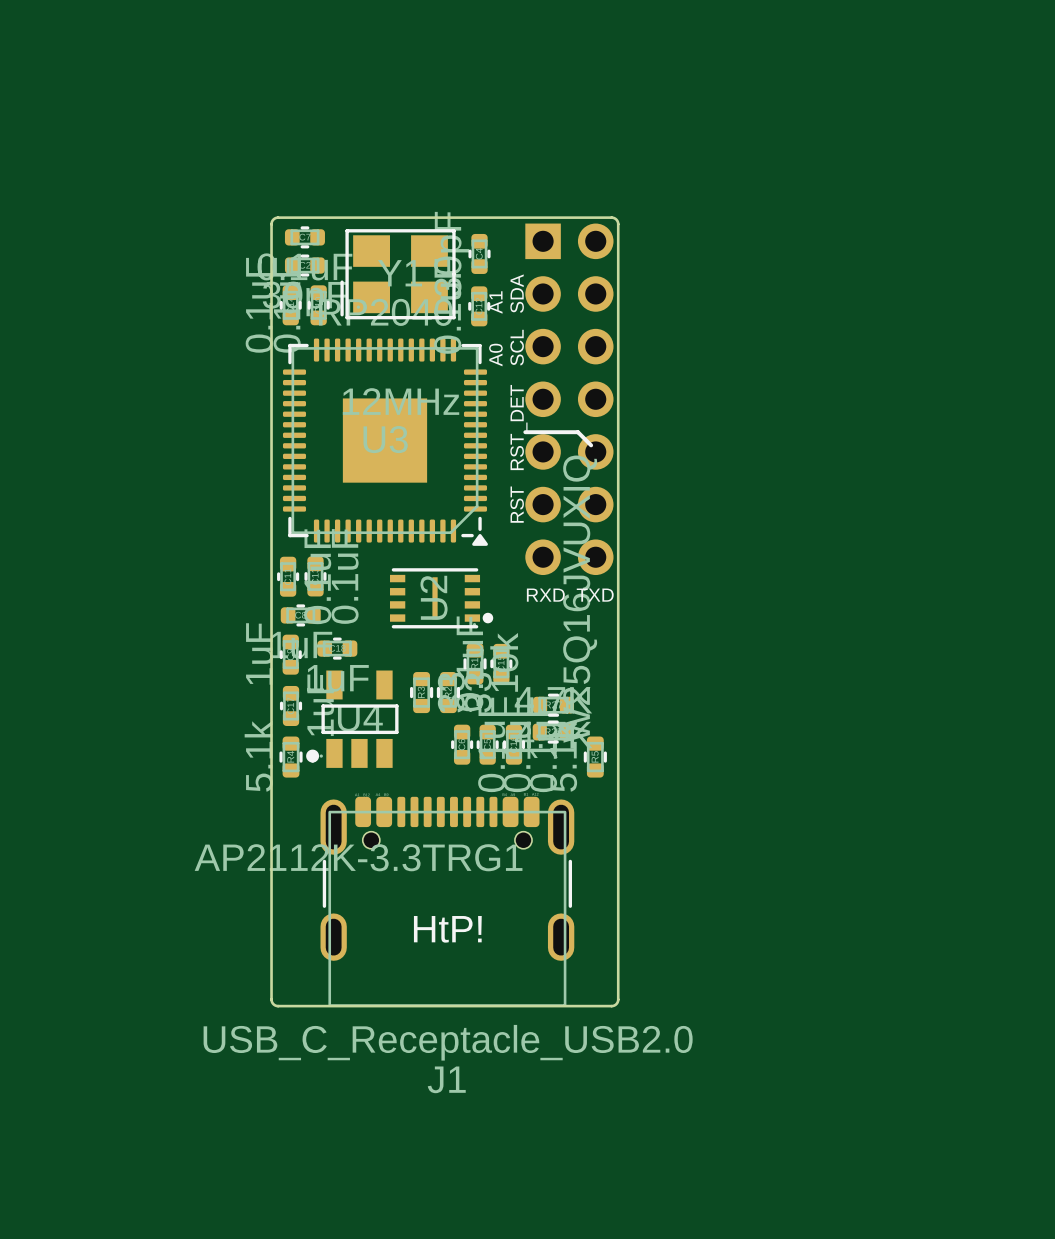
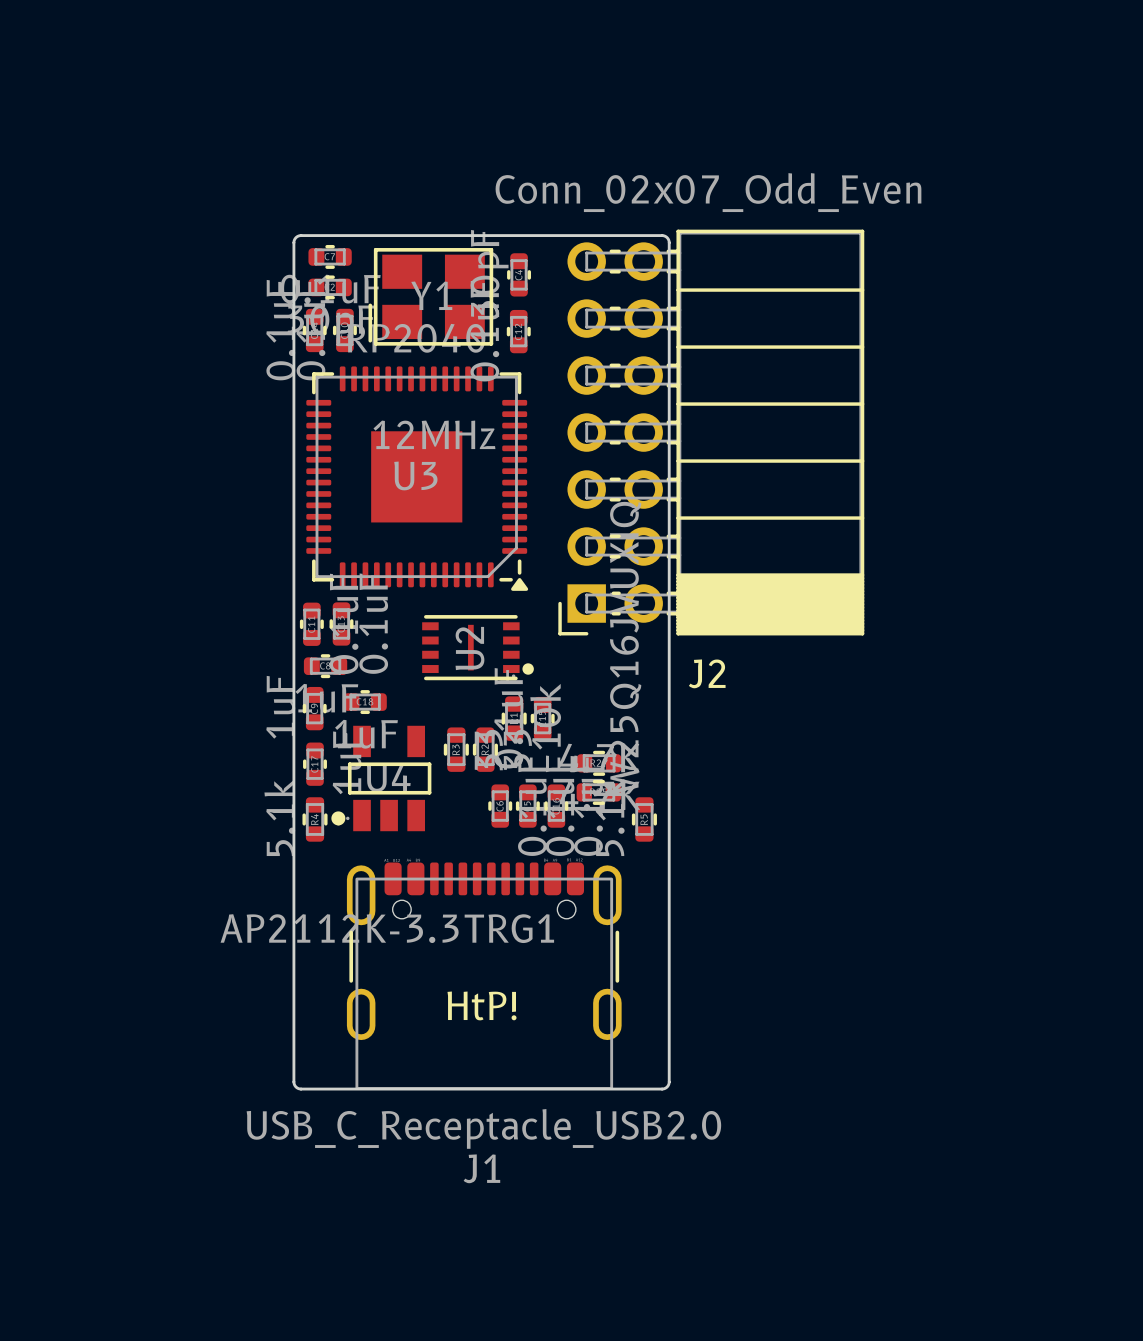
text: SDA (517, 293) -> none
text: A1 (495, 302) -> none
text: SCL (517, 347) -> none
text: A0 (495, 355) -> none
J2 side: bottom (569, 399) -> top (711, 432)
text: RST_DET (518, 427) -> none
line: (525, 432) (577, 432) (591, 445) -> none
text: RST (517, 504) -> none
text: RXD TXD (570, 595) -> none

